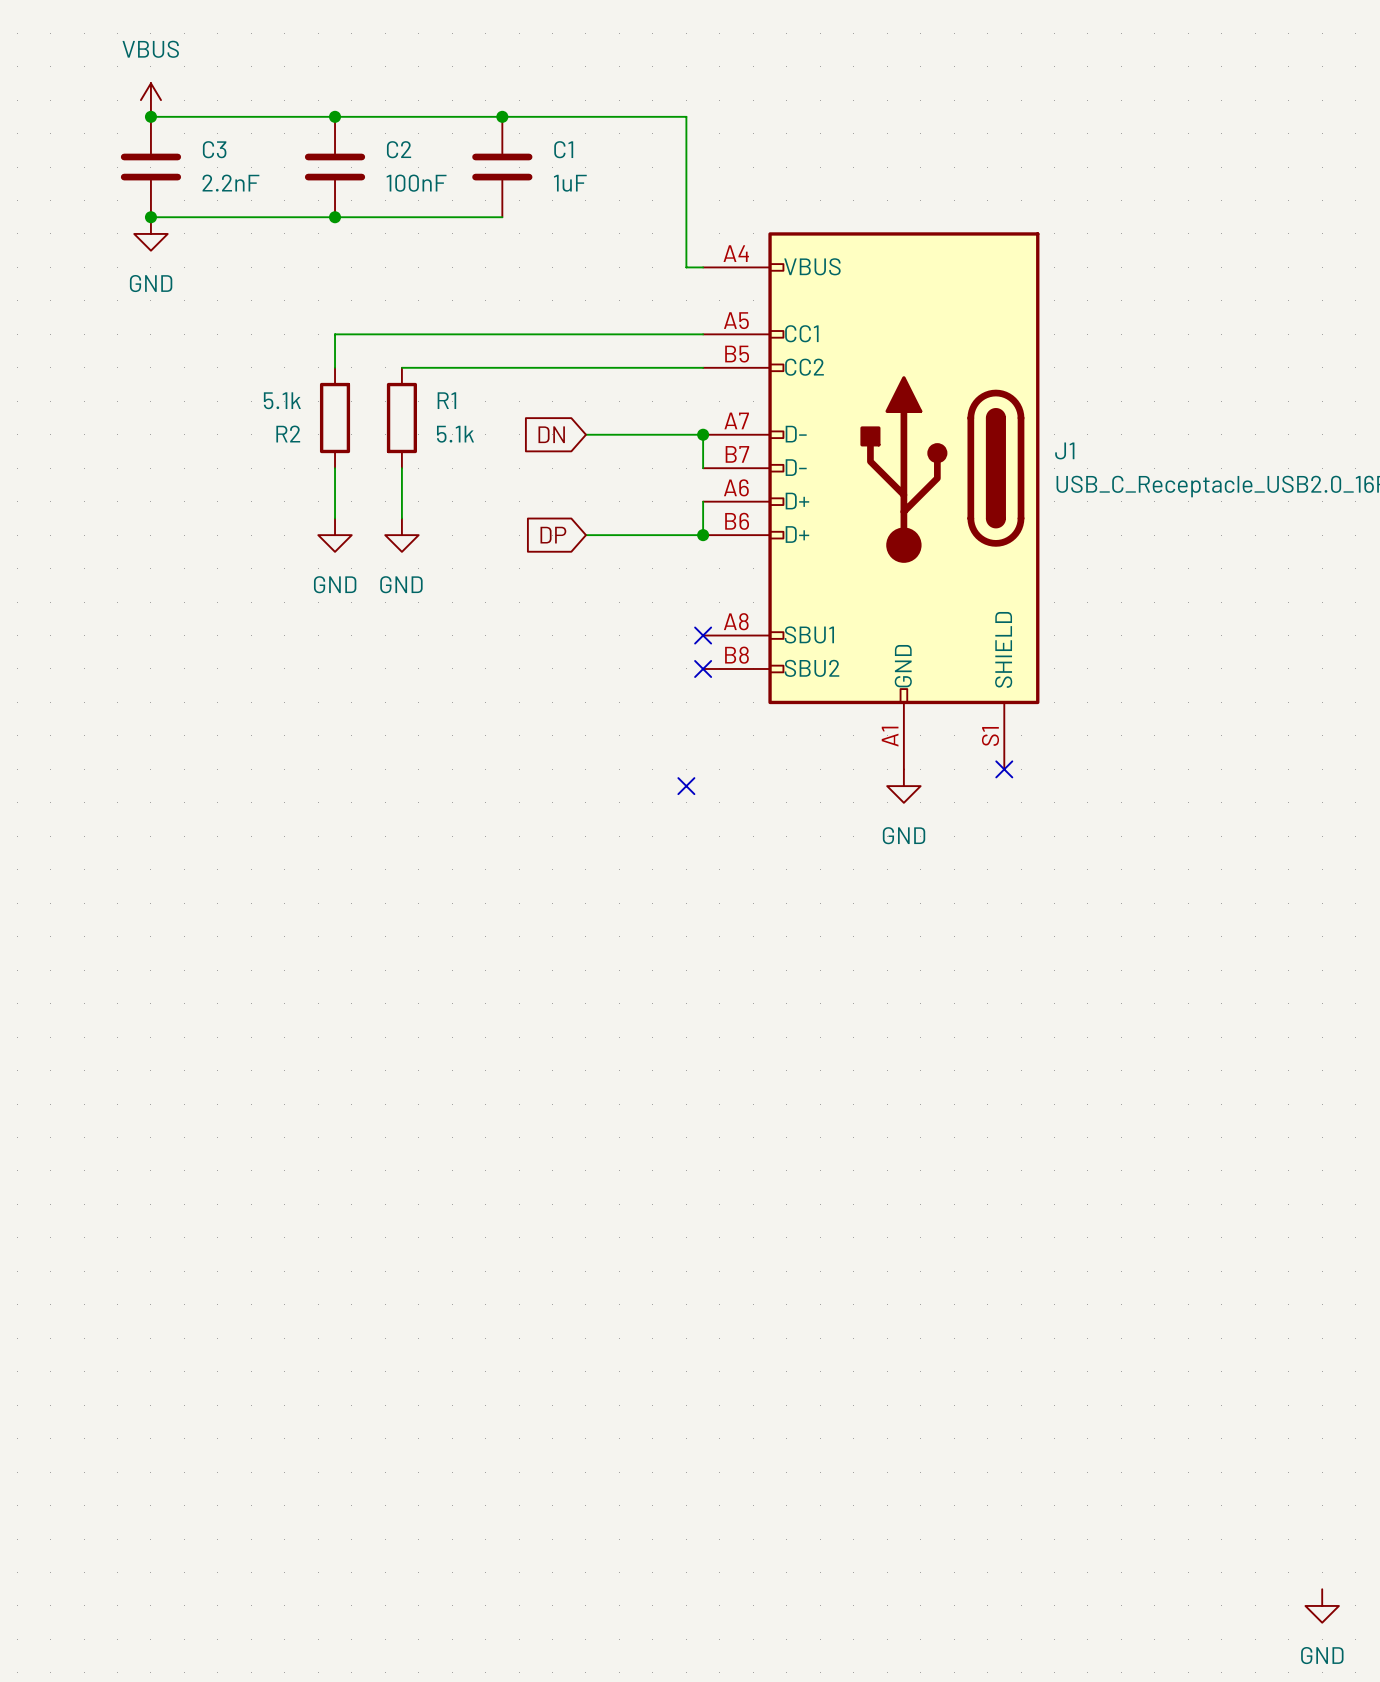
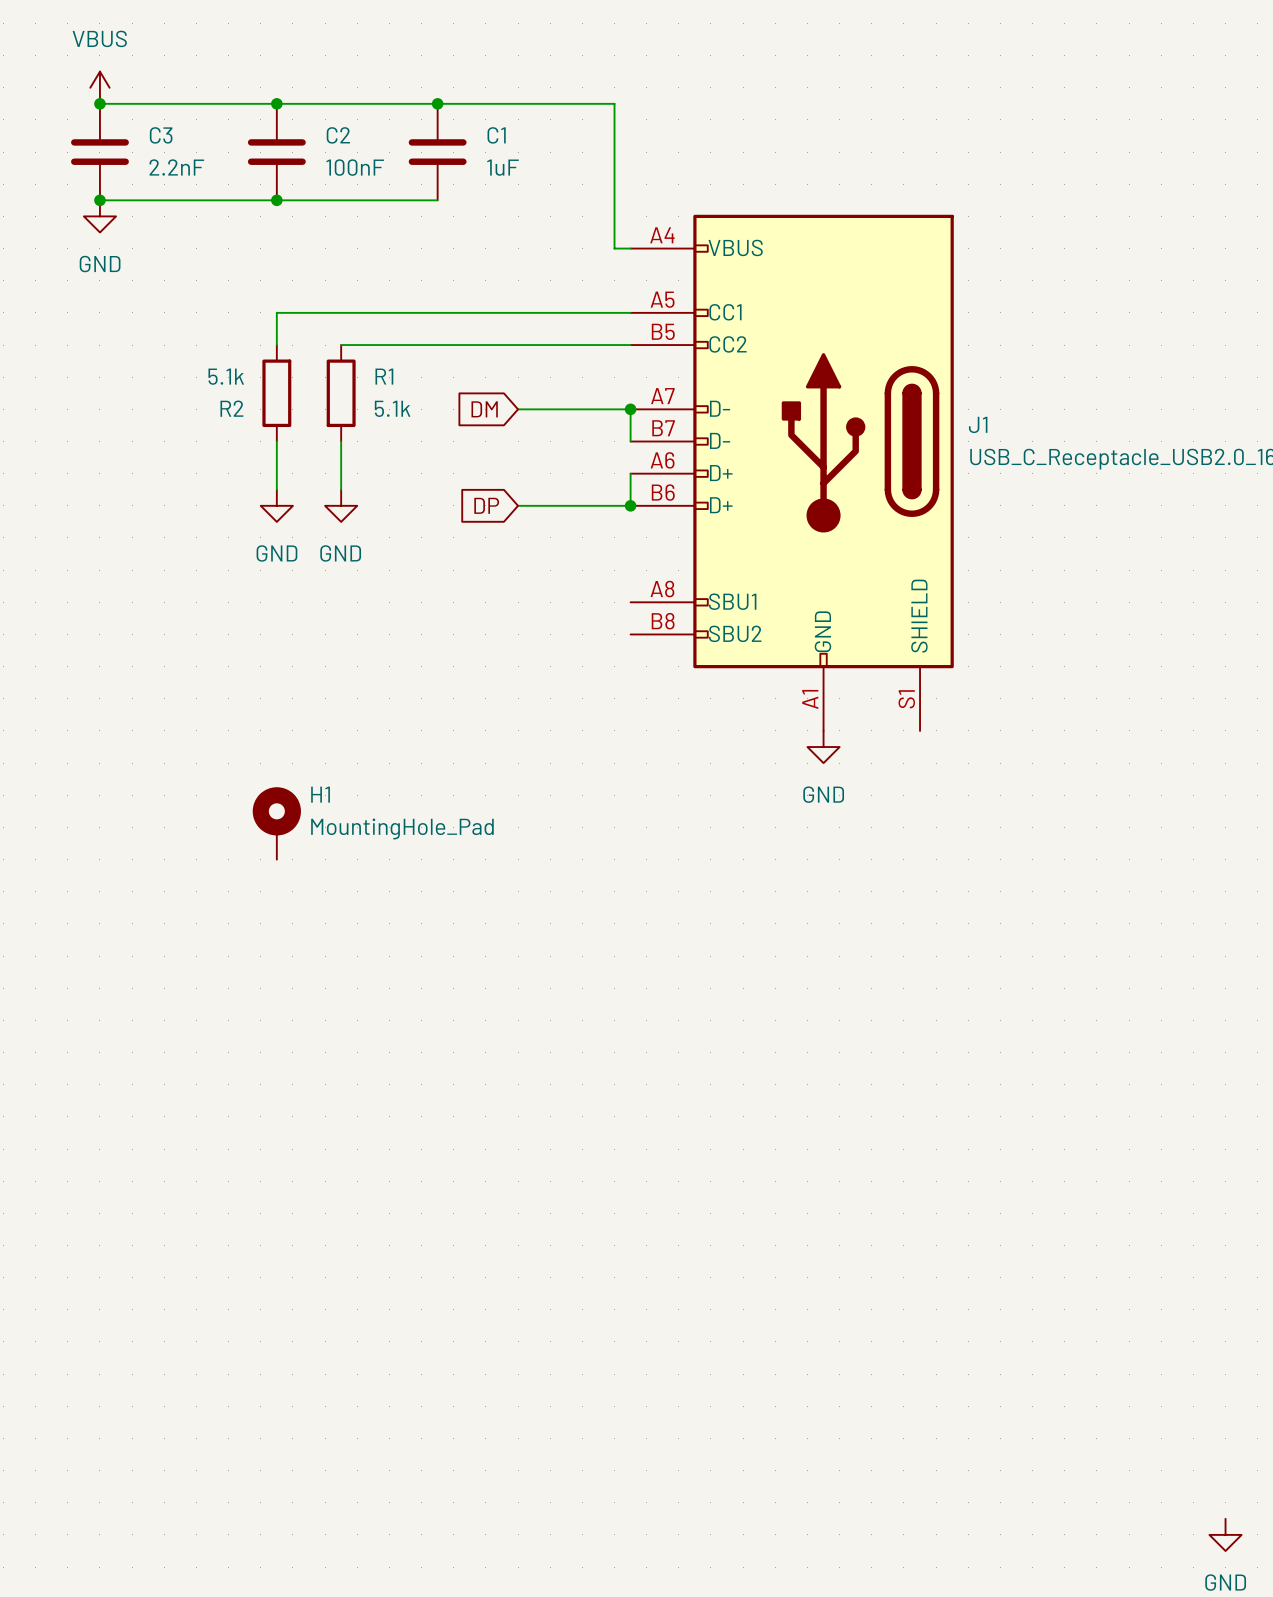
global label: DN (551, 434) -> DM (484, 409)
no-connect mark: (703, 635) -> none
no-connect mark: (703, 668) -> none
no-connect mark: (1004, 769) -> none
no-connect mark: (686, 786) -> none
H1: none -> MountingHole_Pad (276, 823)

